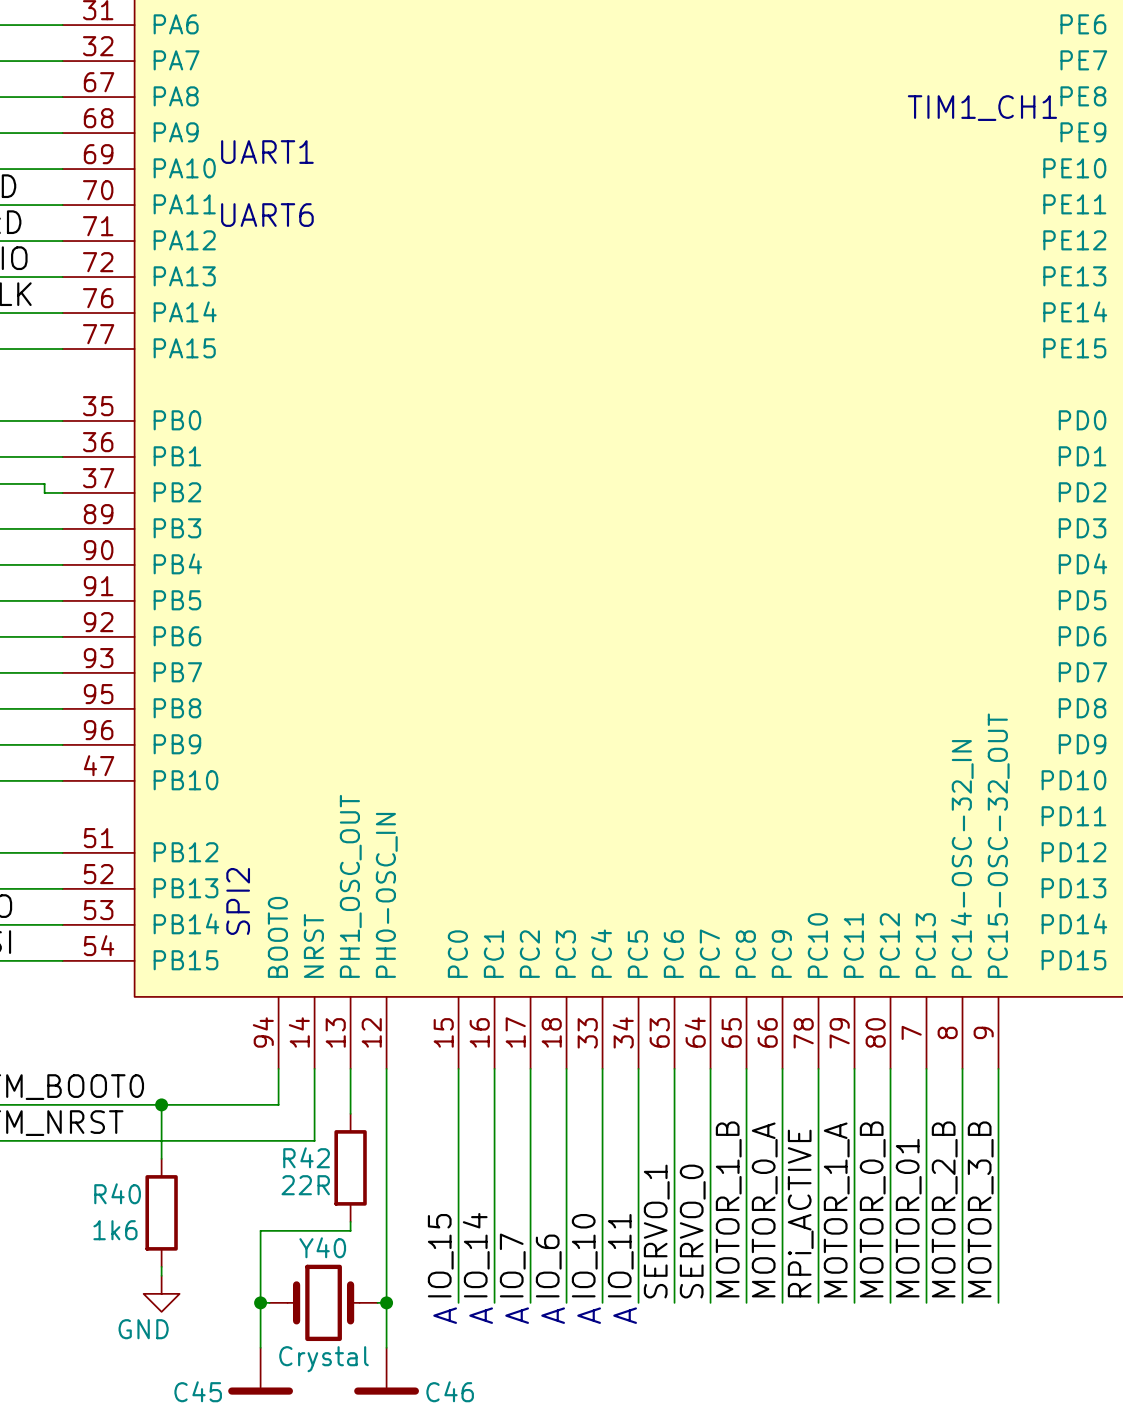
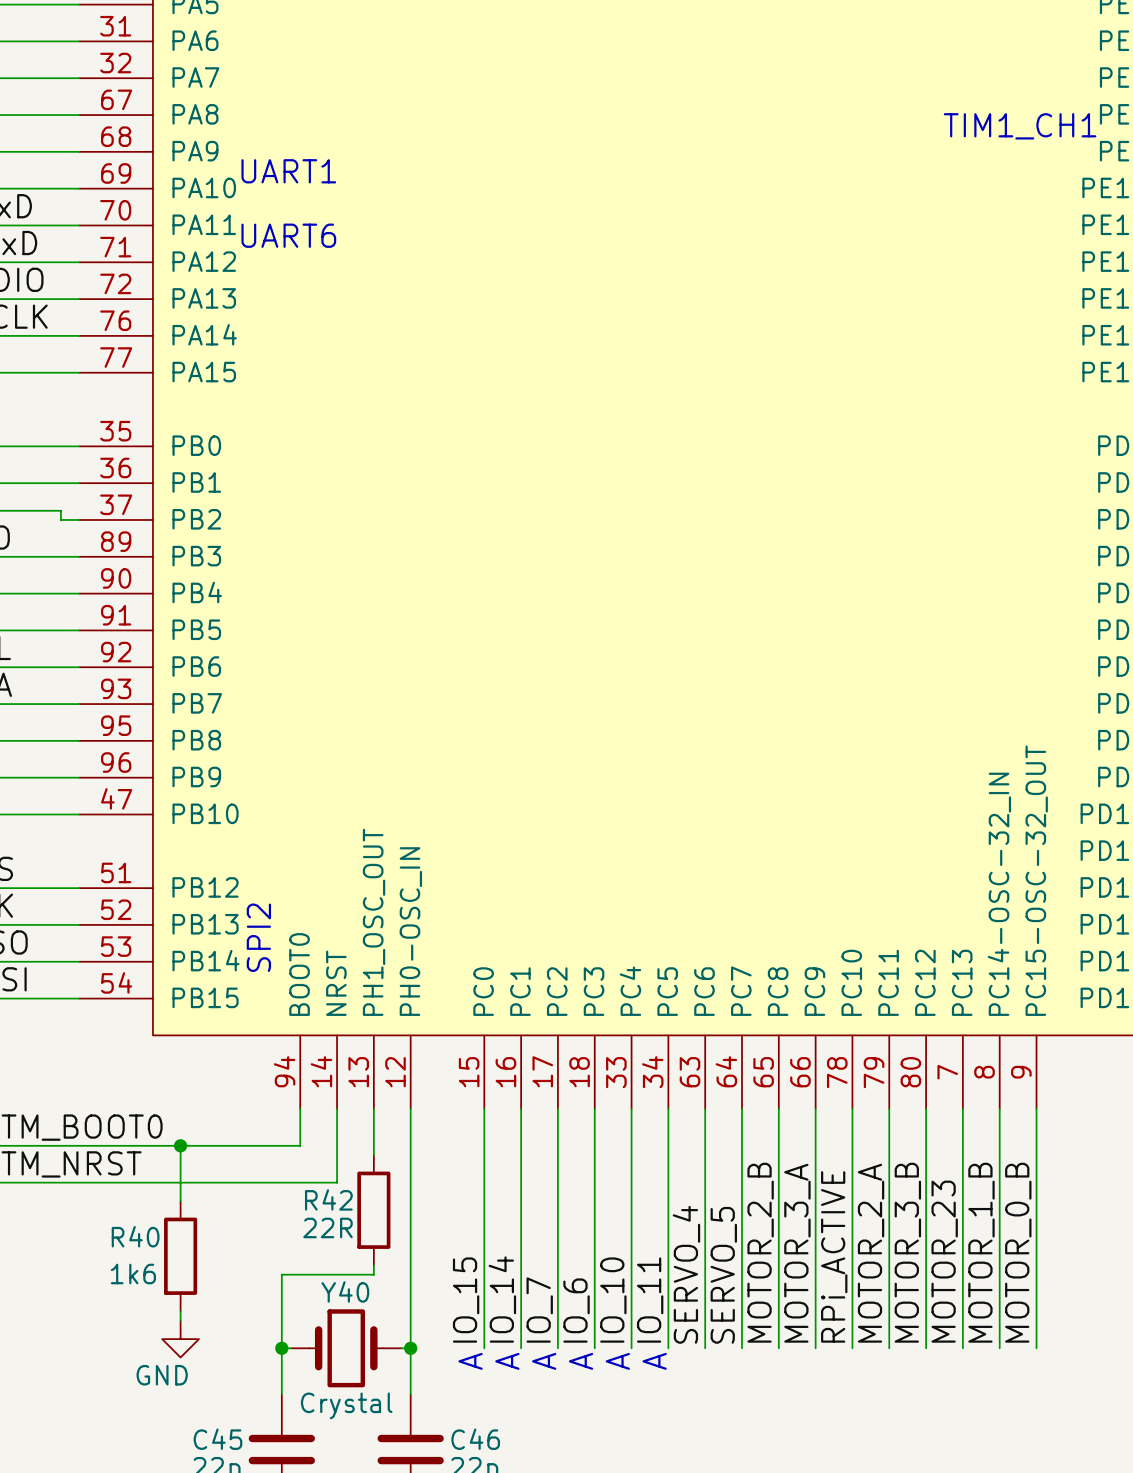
label: MOTOR_1_B (728, 1209) -> MOTOR_2_B (760, 1252)
label: MOTOR_0_A (764, 1209) -> MOTOR_3_A (797, 1253)
label: MOTOR_1_A (836, 1209) -> MOTOR_2_A (871, 1253)
label: MOTOR_0_B (872, 1209) -> MOTOR_3_B (907, 1252)
label: MOTOR_2_B (944, 1209) -> MOTOR_1_B (981, 1252)
label: MOTOR_3_B (980, 1209) -> MOTOR_0_B (1018, 1252)
label: MOTOR_01 (908, 1218) -> MOTOR_23 (944, 1261)
label: SERVO_1 (656, 1231) -> SERVO_4 (686, 1274)
label: SERVO_0 (692, 1231) -> SERVO_5 (723, 1275)

